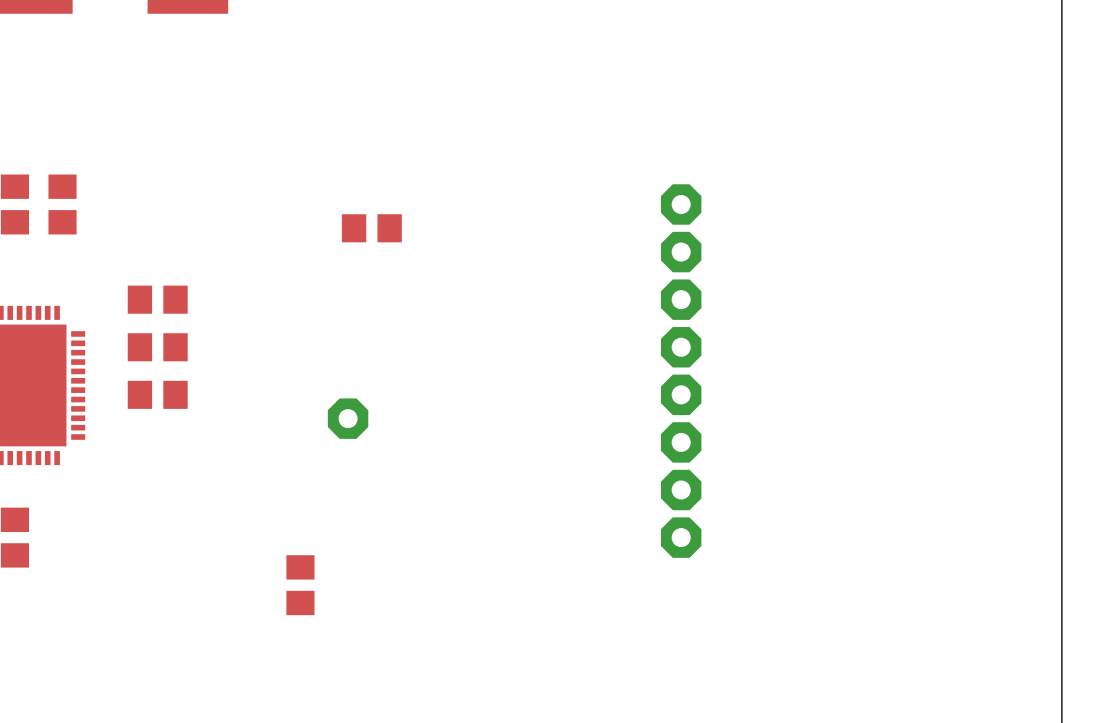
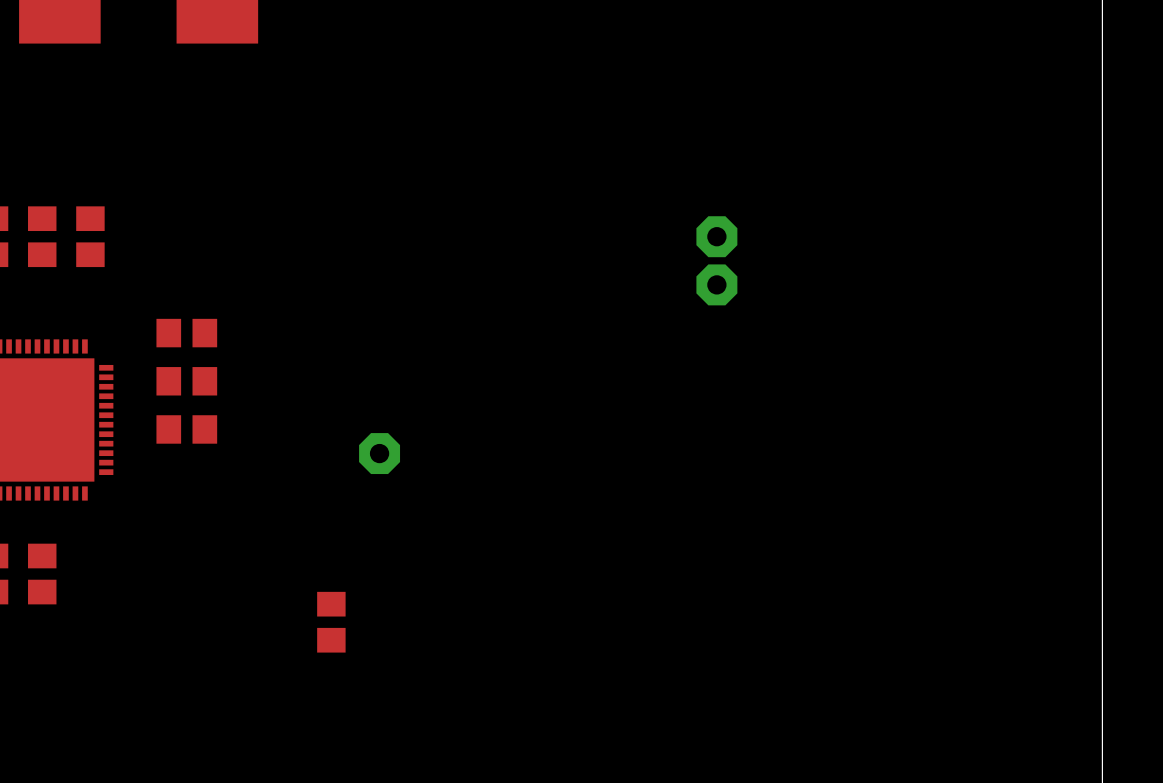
part: (371, 228) -> none
part: (681, 299) -> none
part: (681, 347) -> none
part: (681, 394) -> none
part: (681, 442) -> none
part: (681, 490) -> none
part: (681, 537) -> none

